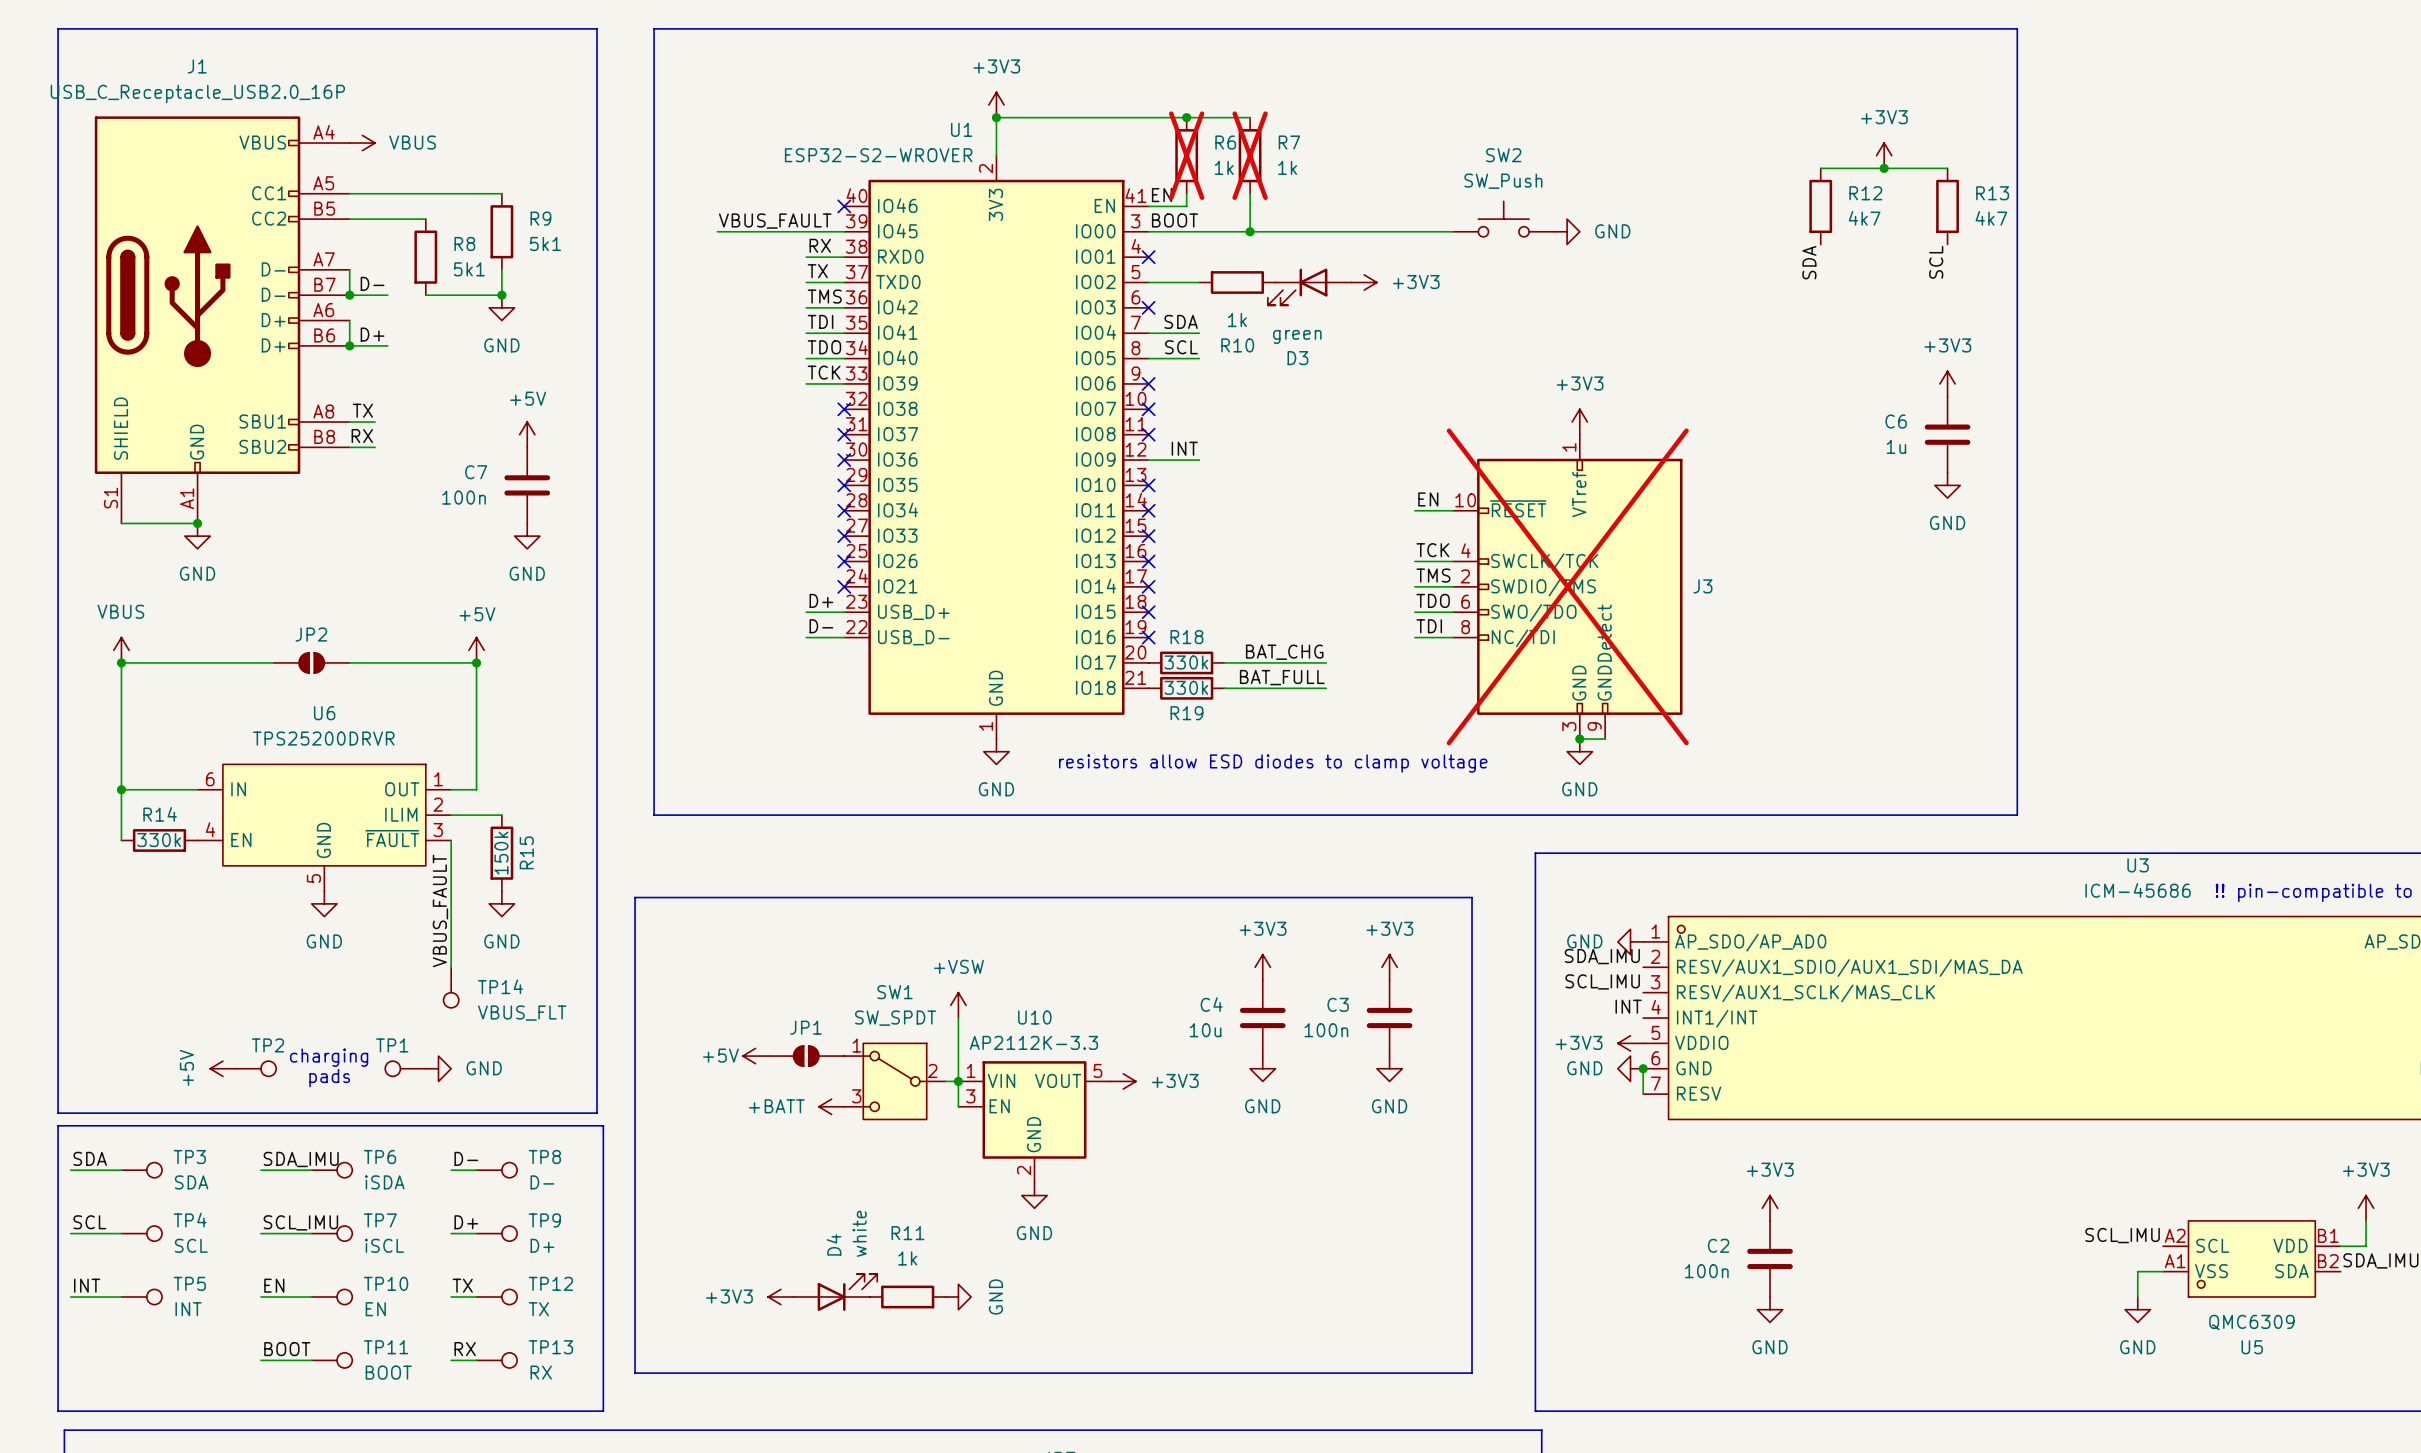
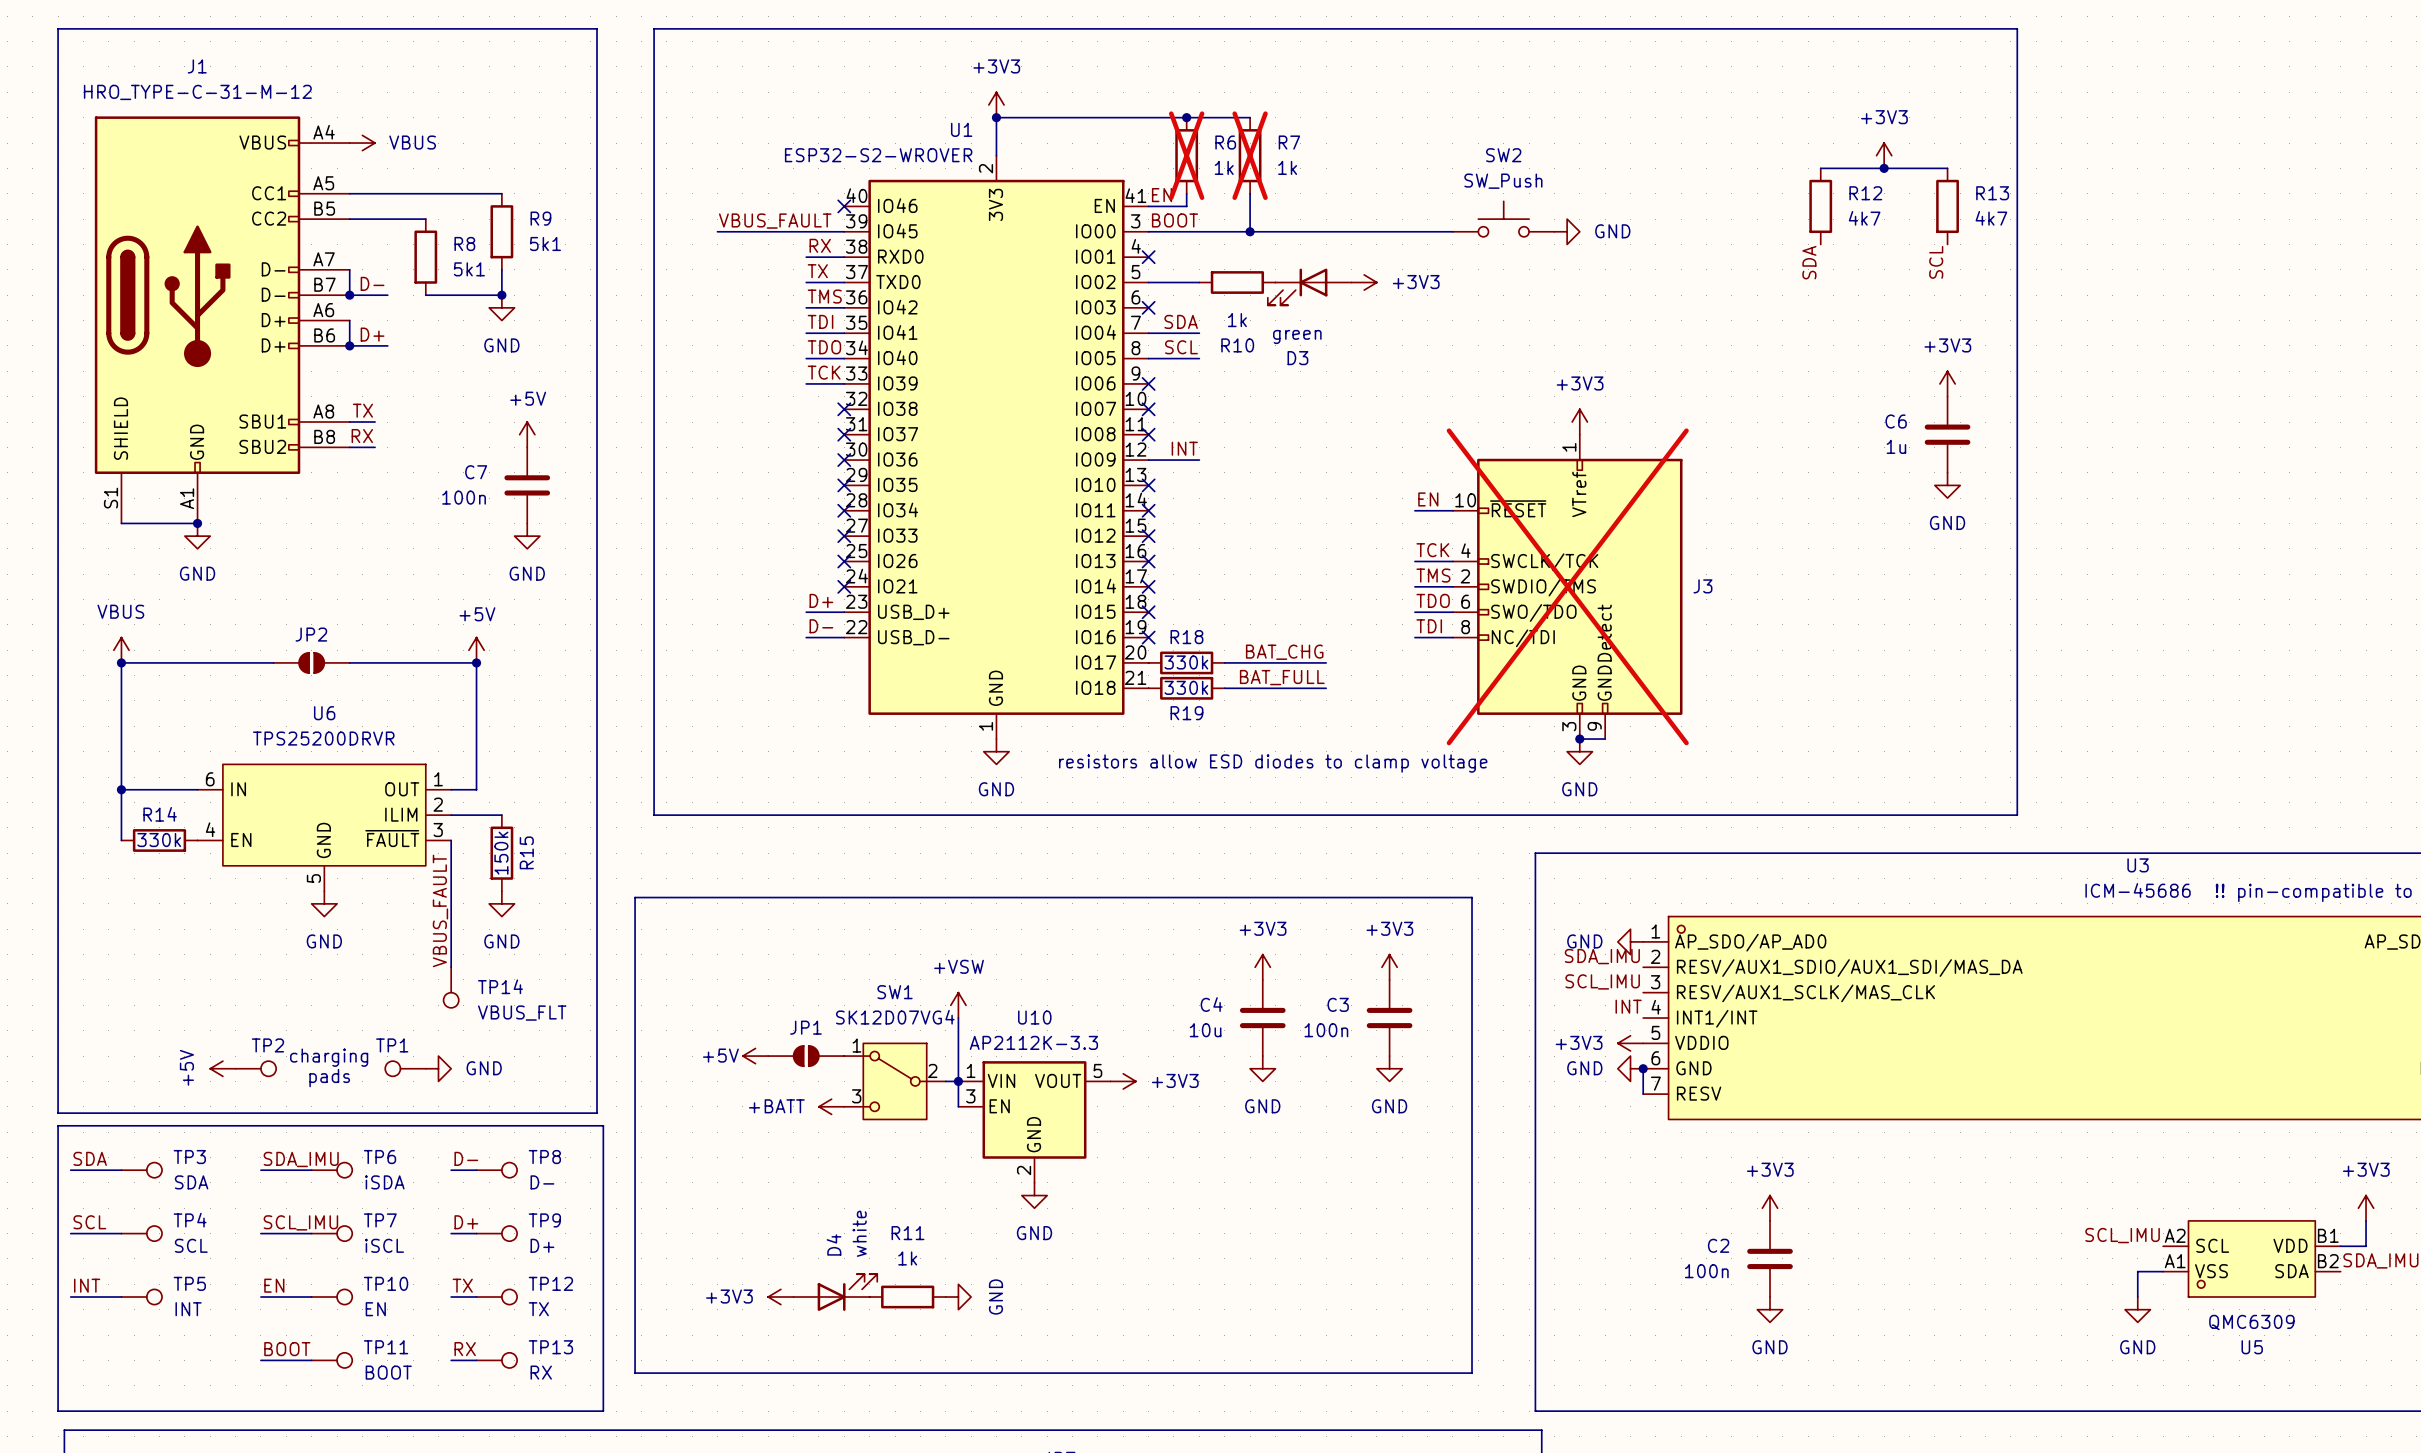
J1 value: USB_C_Receptacle_USB2.0_16P (197, 93) -> HRO_TYPE-C-31-M-12 (197, 92)
SW1 value: SW_SPDT (895, 1018) -> SK12D07VG4 (895, 1017)

